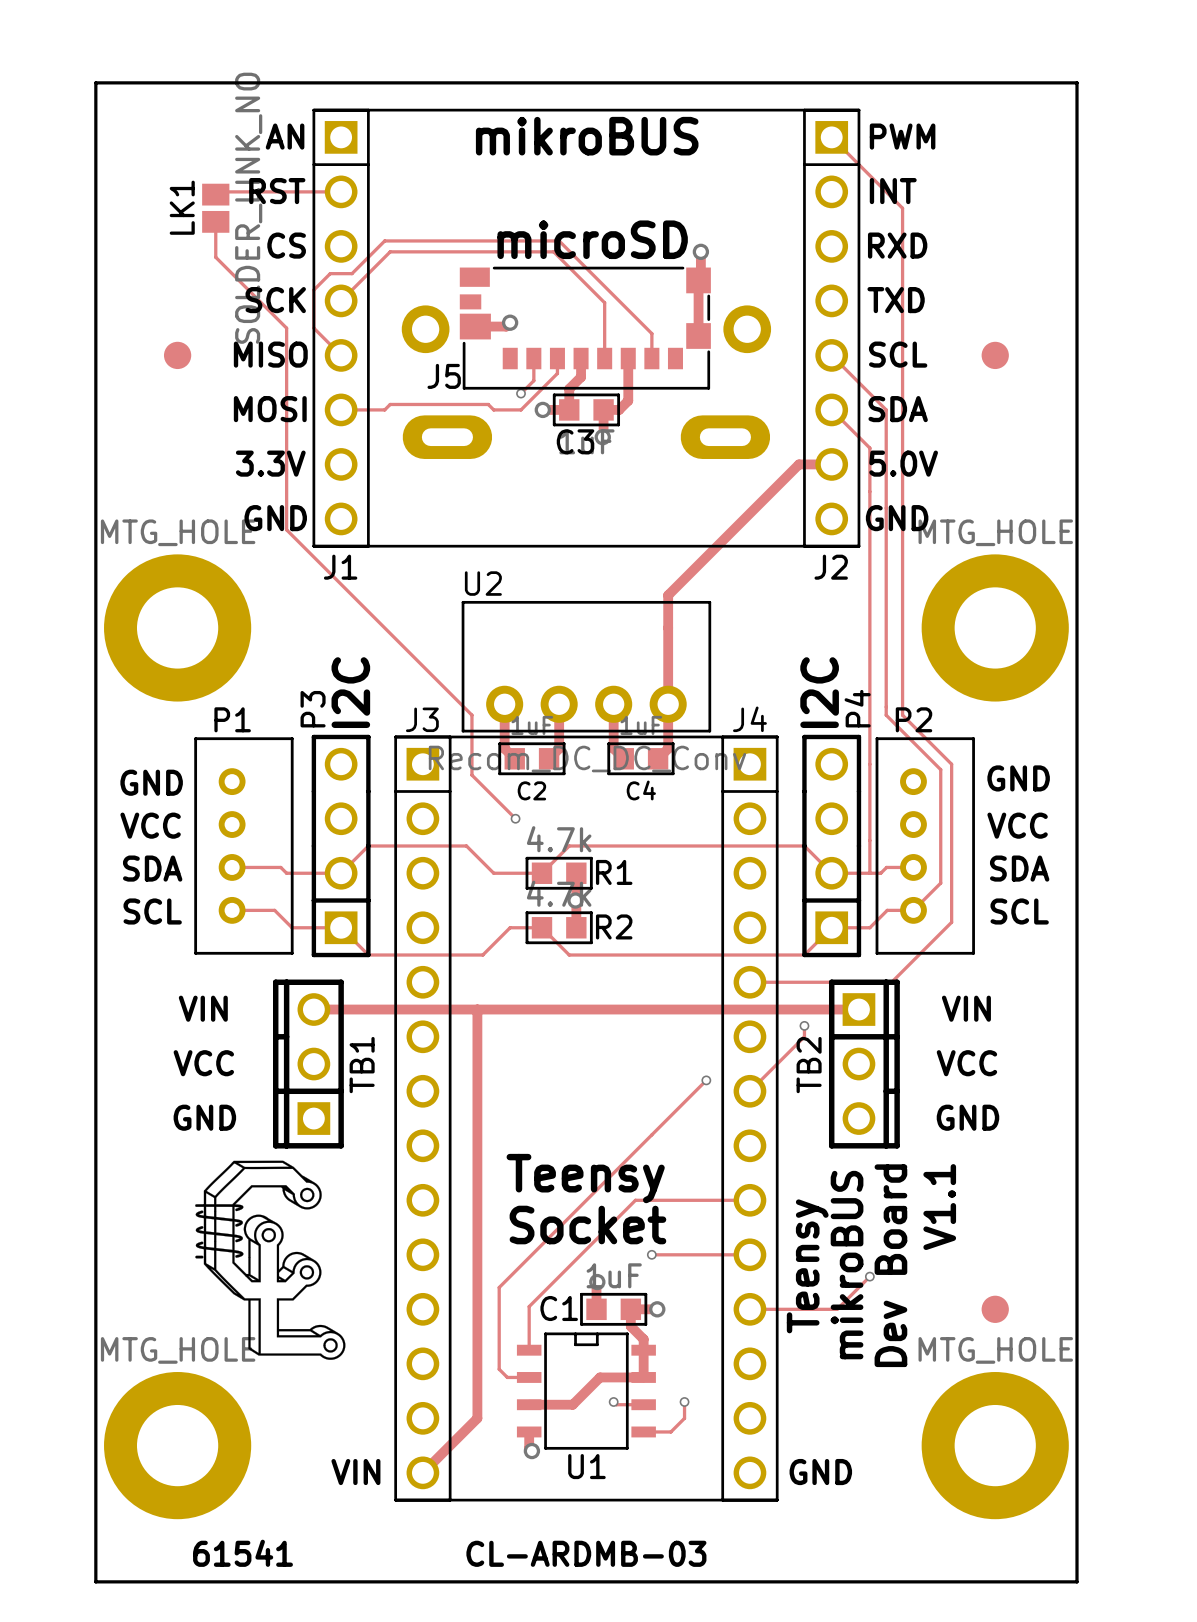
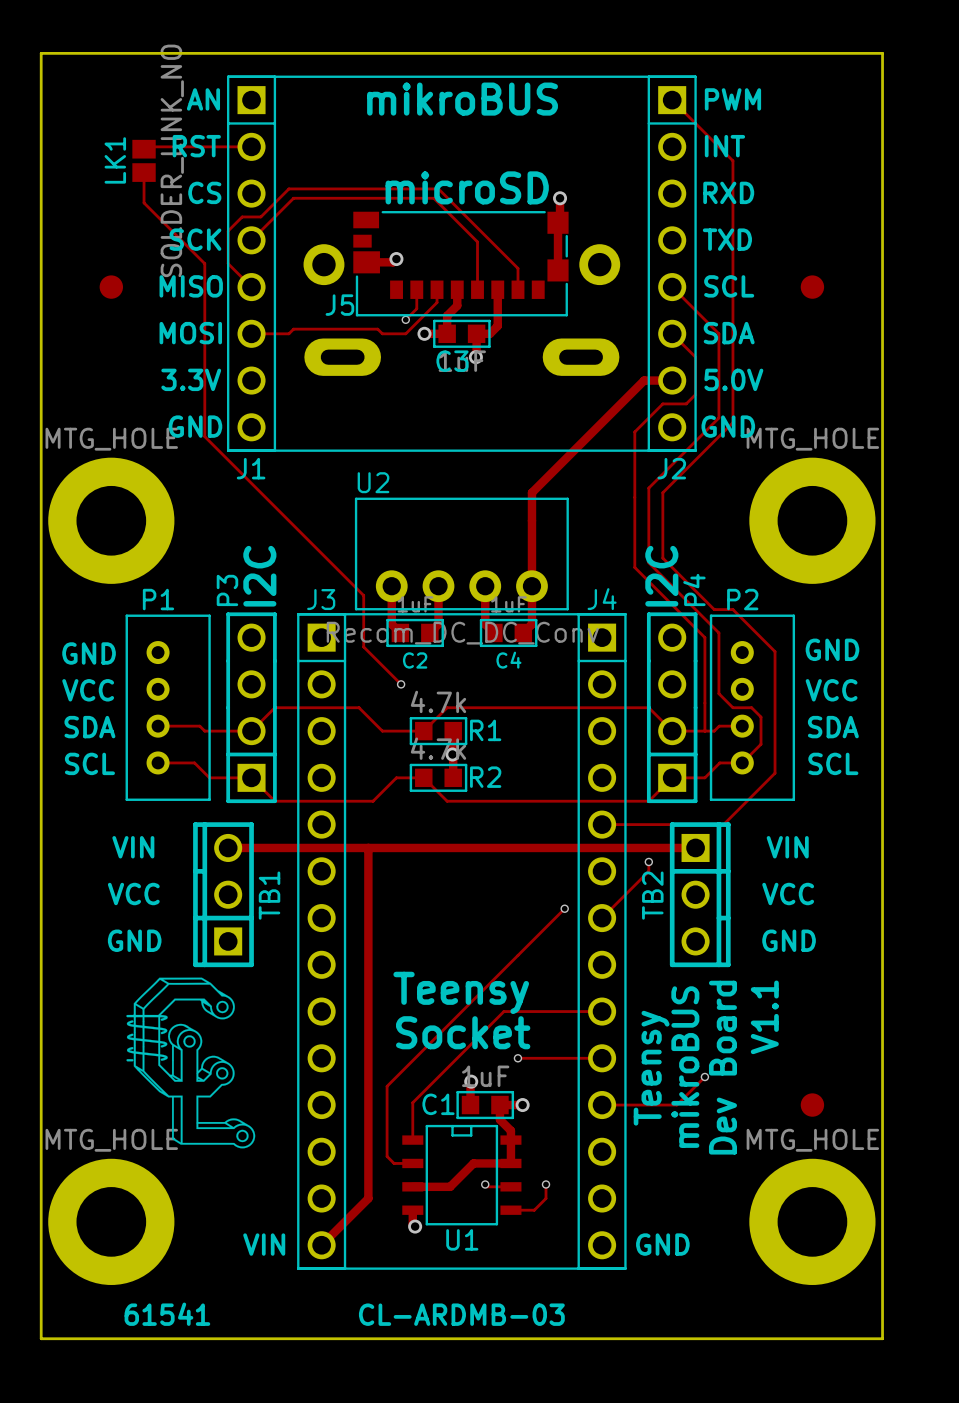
track: (858, 437) (869, 448) (869, 764) -> (695, 357) (695, 394) (686, 403) (662, 403) (634, 431) (634, 567) (704, 637)
track: (886, 508) (886, 715) (902, 731) -> (732, 422) (662, 492) (662, 558) (714, 609) (732, 609)
track: none -> (718, 417) (648, 488) (648, 562) (718, 632) (718, 693) (732, 707) (751, 707) (761, 717) (761, 744)
track: (902, 513) (902, 715) (951, 764) (951, 780) -> none
track: (940, 769) (940, 883) (935, 888) -> (765, 642) (775, 651)

